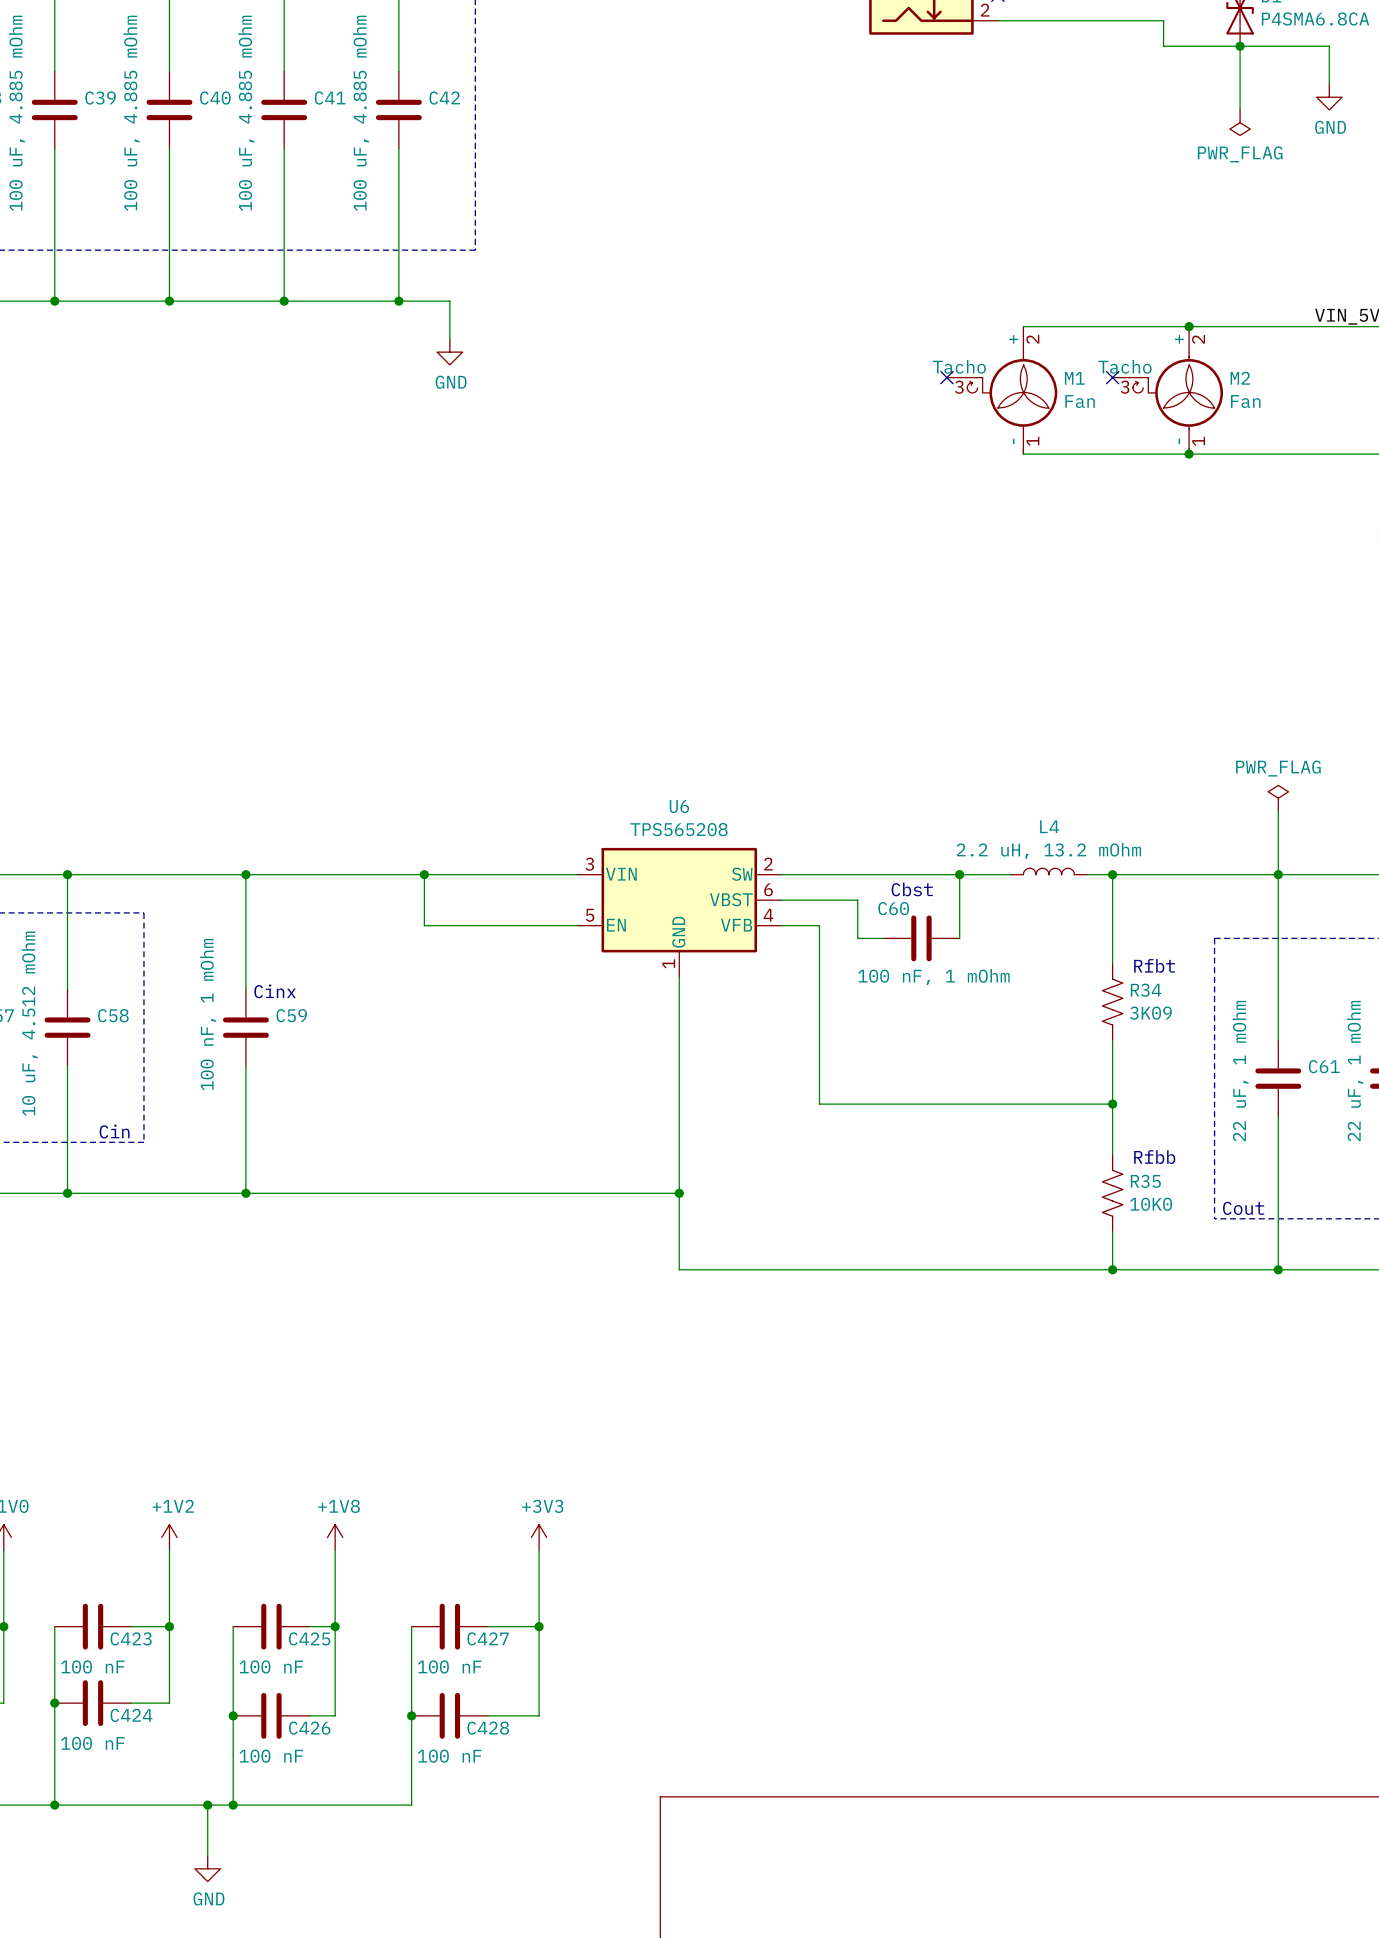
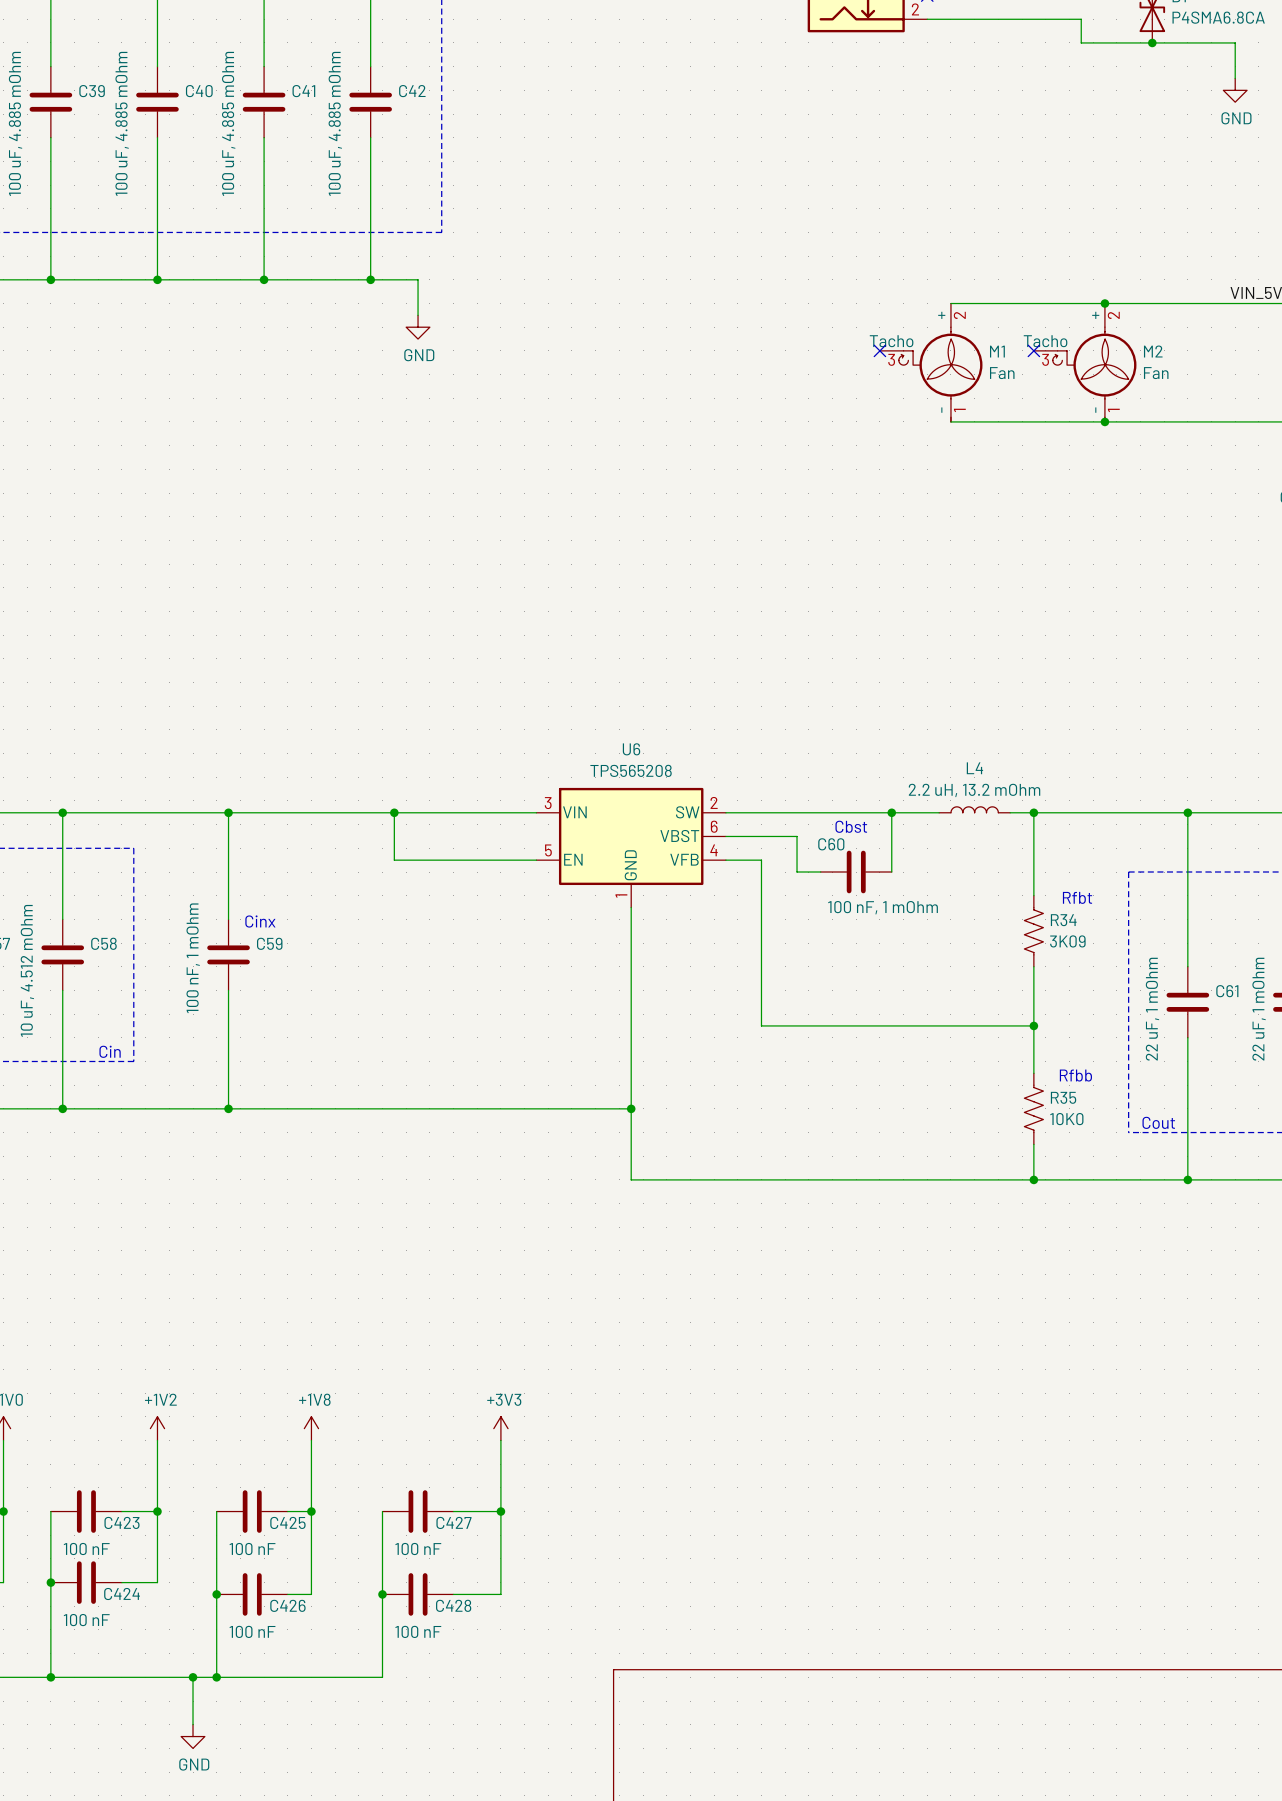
wire: (1240, 46) (1240, 109) -> none
power symbol: PWR_FLAG (1240, 122) -> none
power symbol: PWR_FLAG (1278, 798) -> none
wire: (1278, 810) (1278, 874) -> none

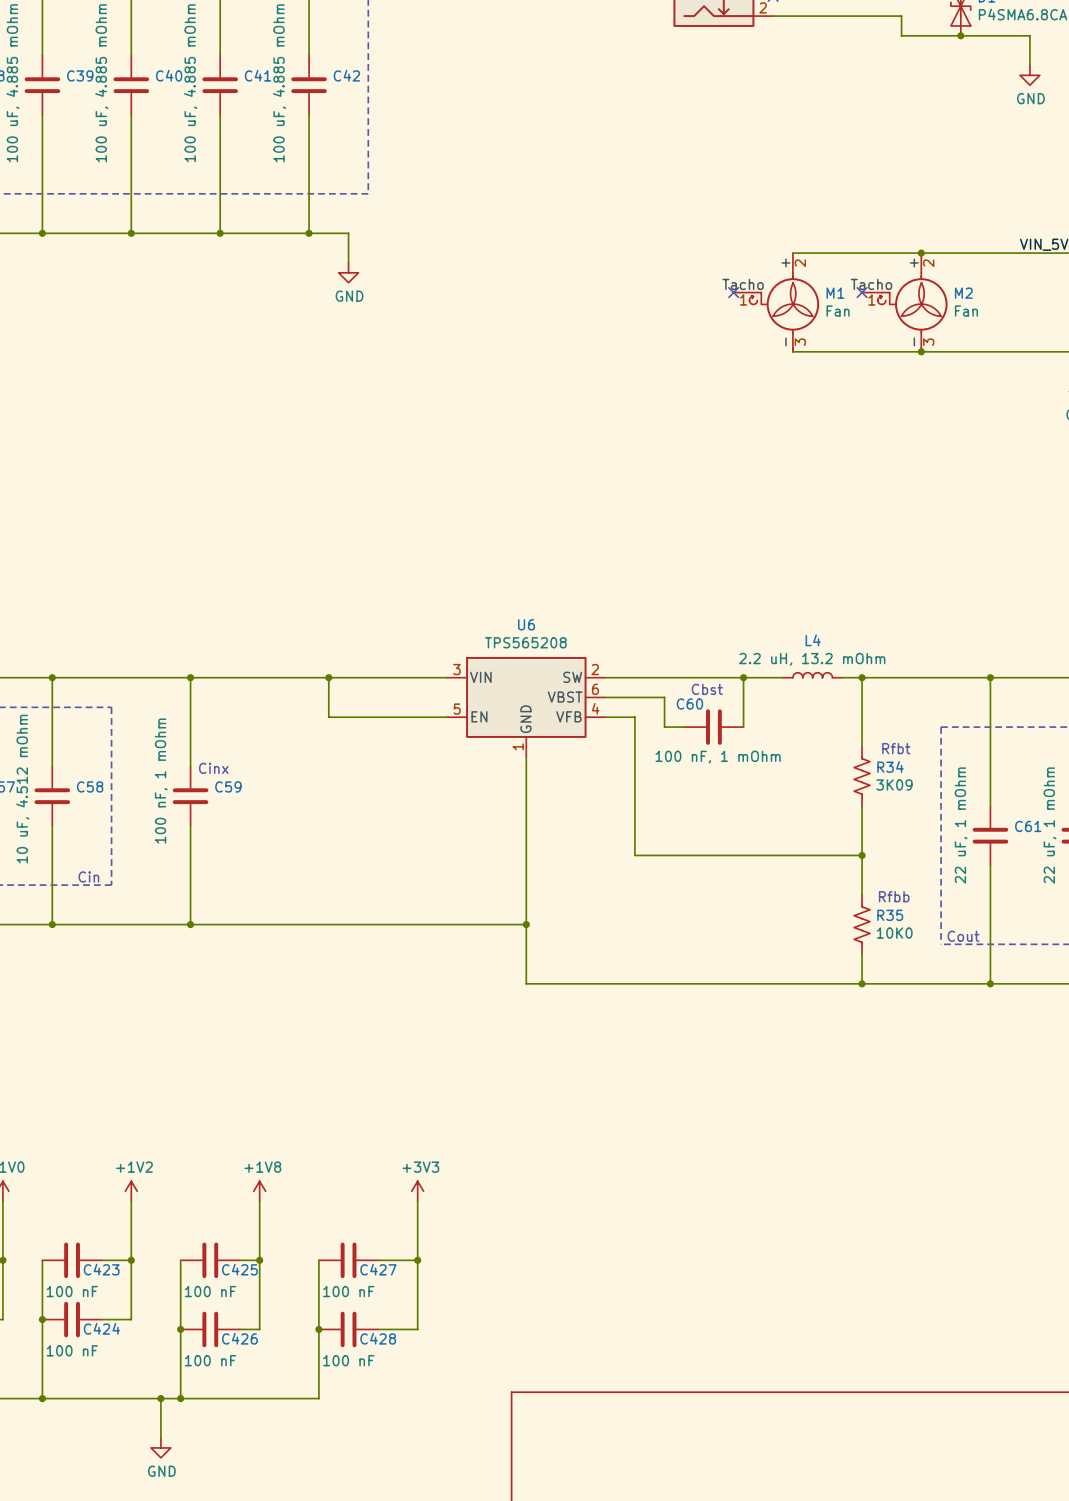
M1 pin number: 3 (891, 359) -> 1 (743, 299)
M2 pin number: 3 (1045, 359) -> 1 (871, 299)
M1 pin number: 1 (959, 410) -> 3 (800, 342)
M2 pin number: 1 (1113, 410) -> 3 (928, 342)

